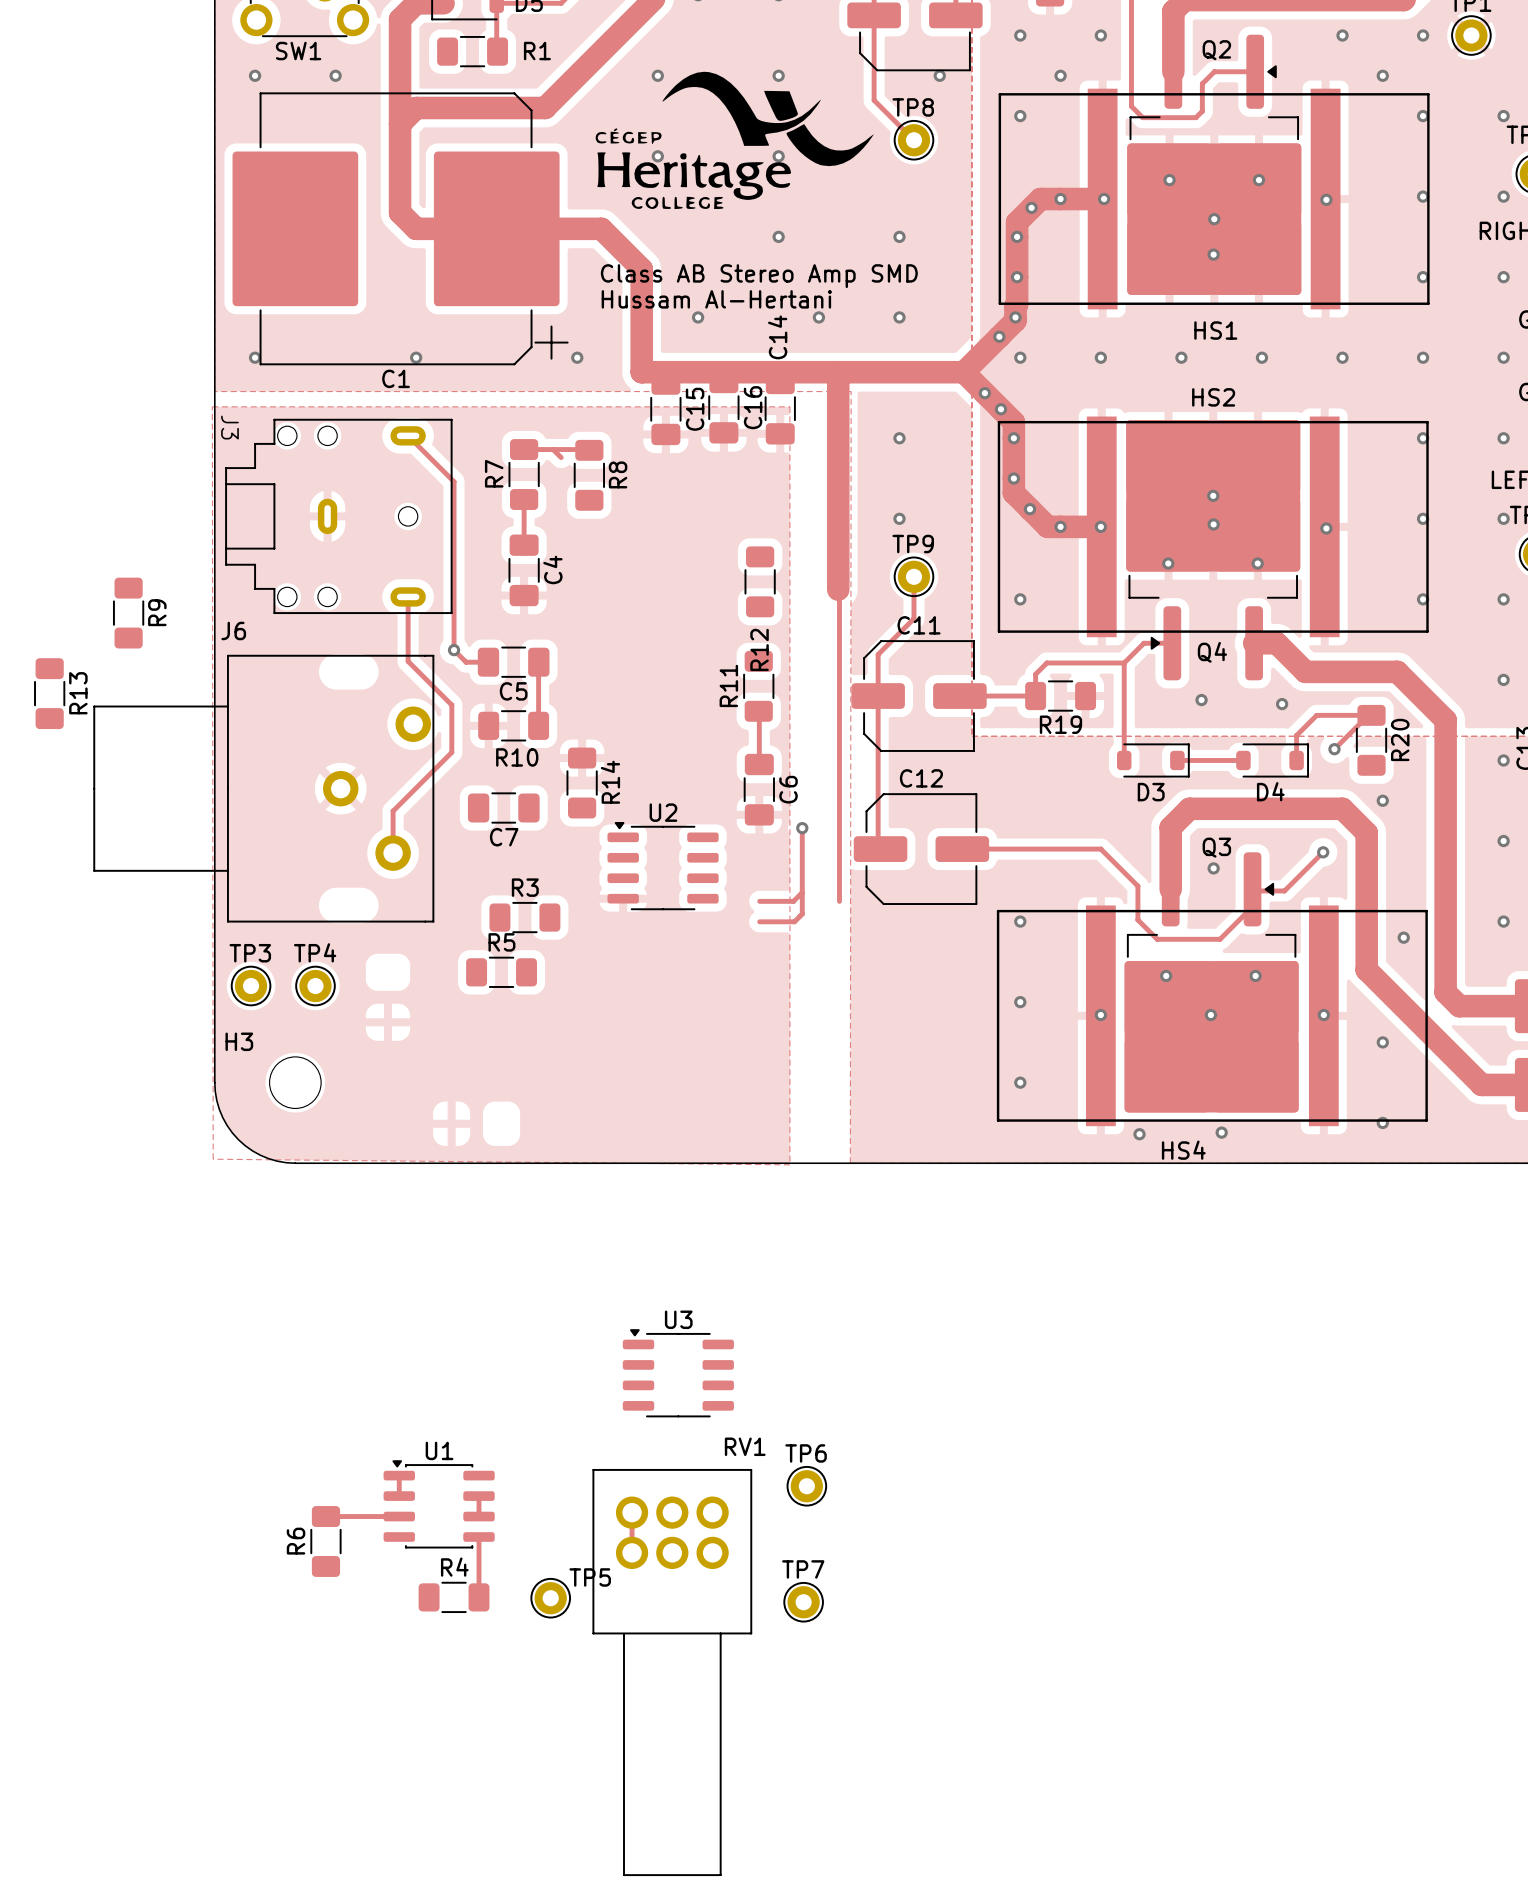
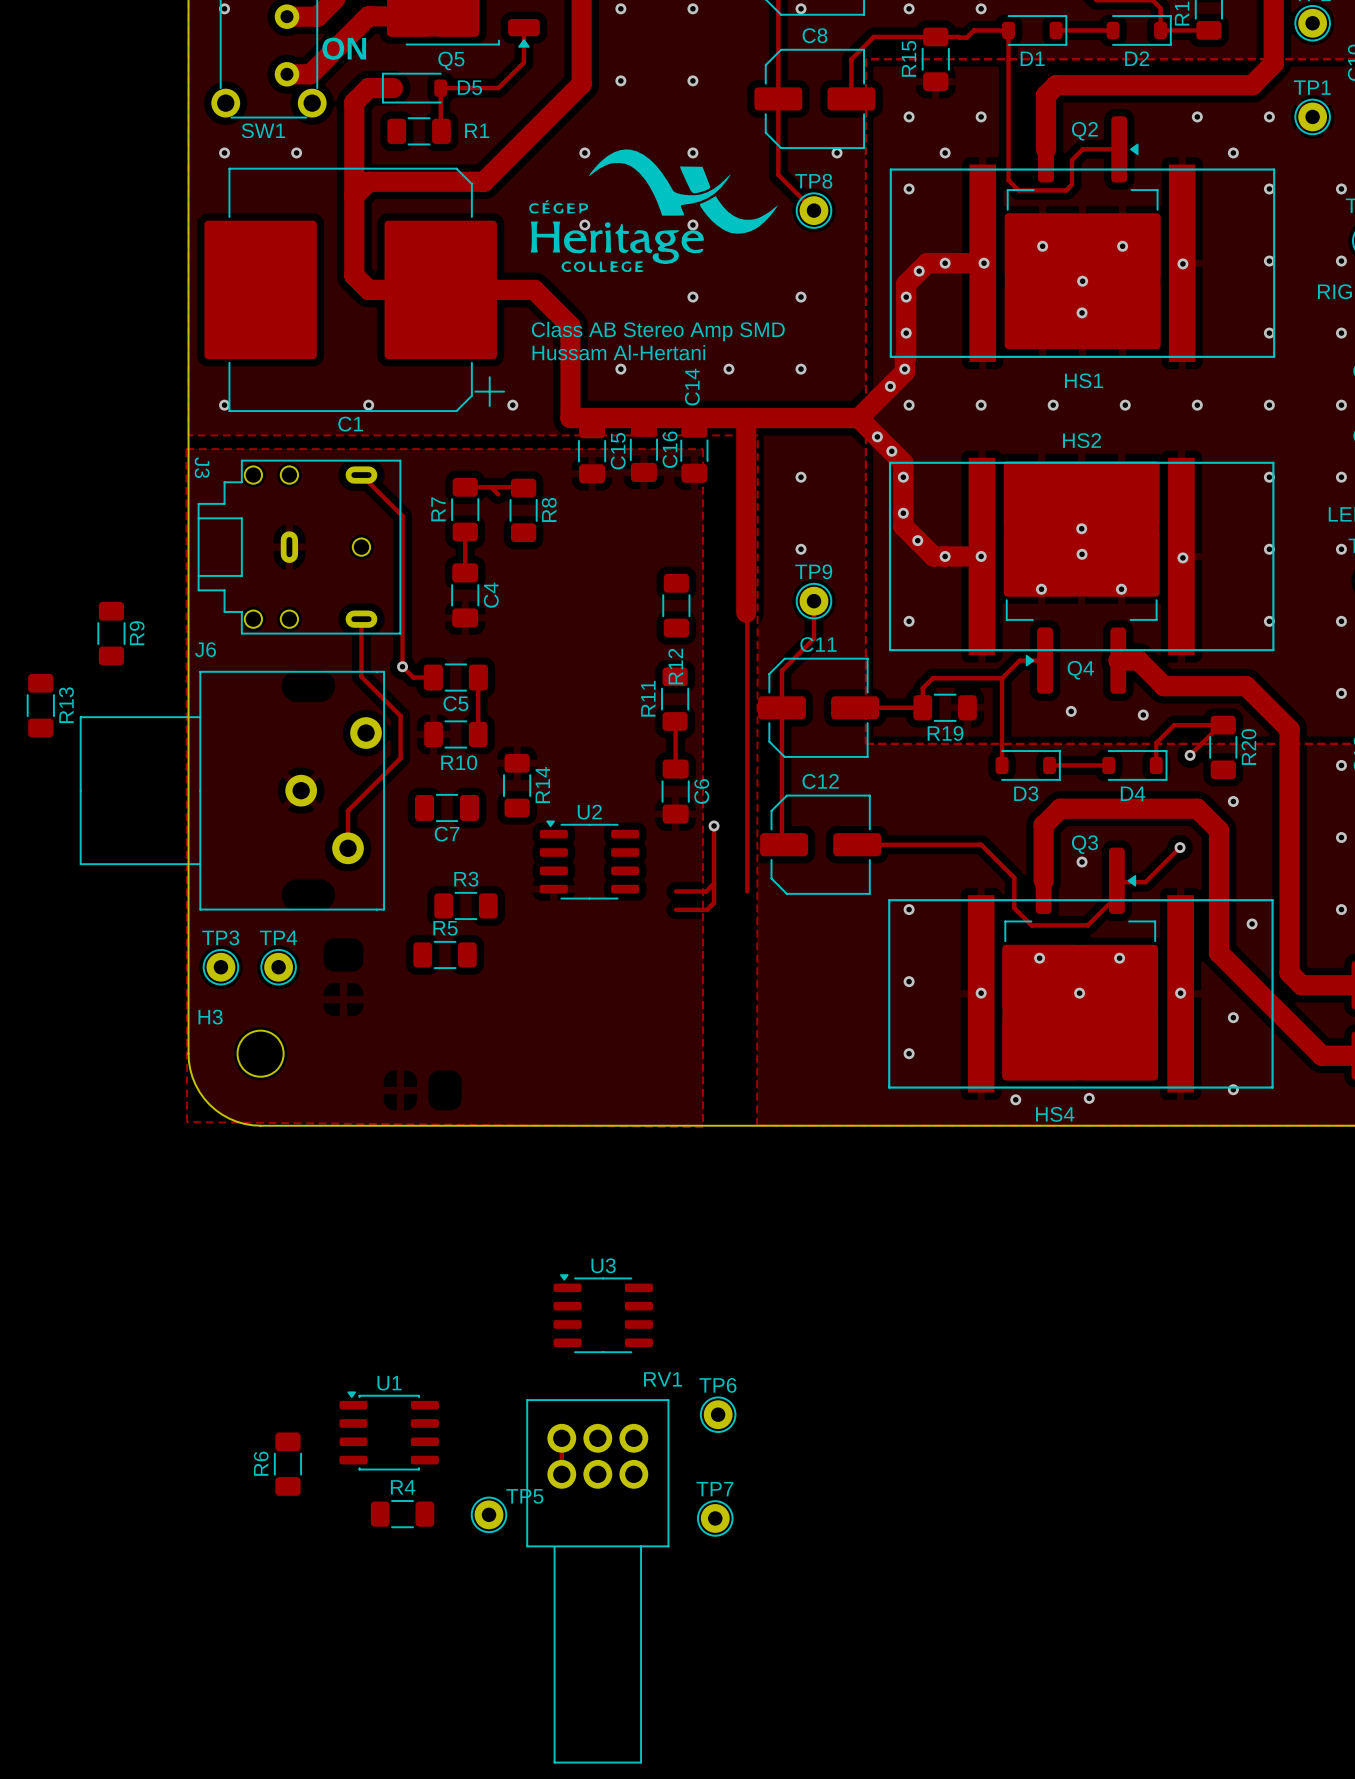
track: (399, 1475) (399, 1496) -> none
track: (479, 1496) (479, 1516) -> none
track: (325, 1516) (399, 1516) -> none
track: (479, 1536) (479, 1597) -> none

